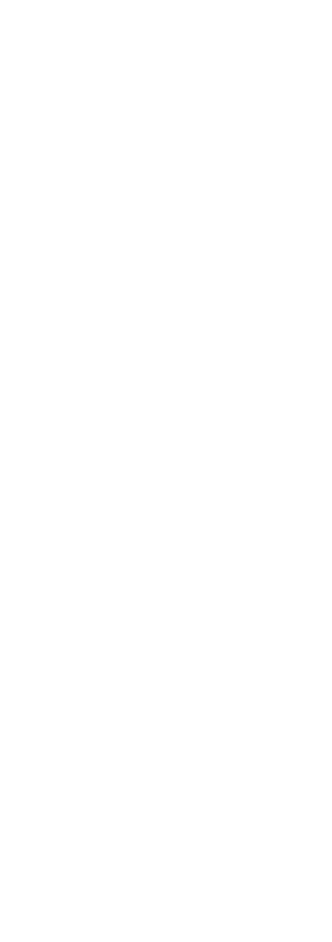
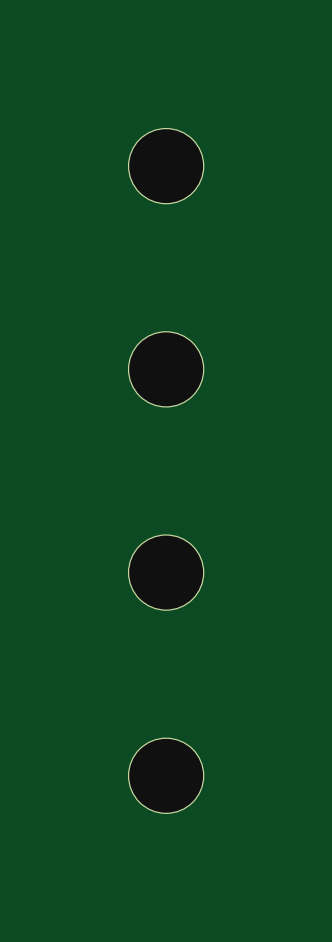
part: none -> (166, 166)
part: none -> (166, 369)
part: none -> (166, 572)
part: none -> (166, 775)

